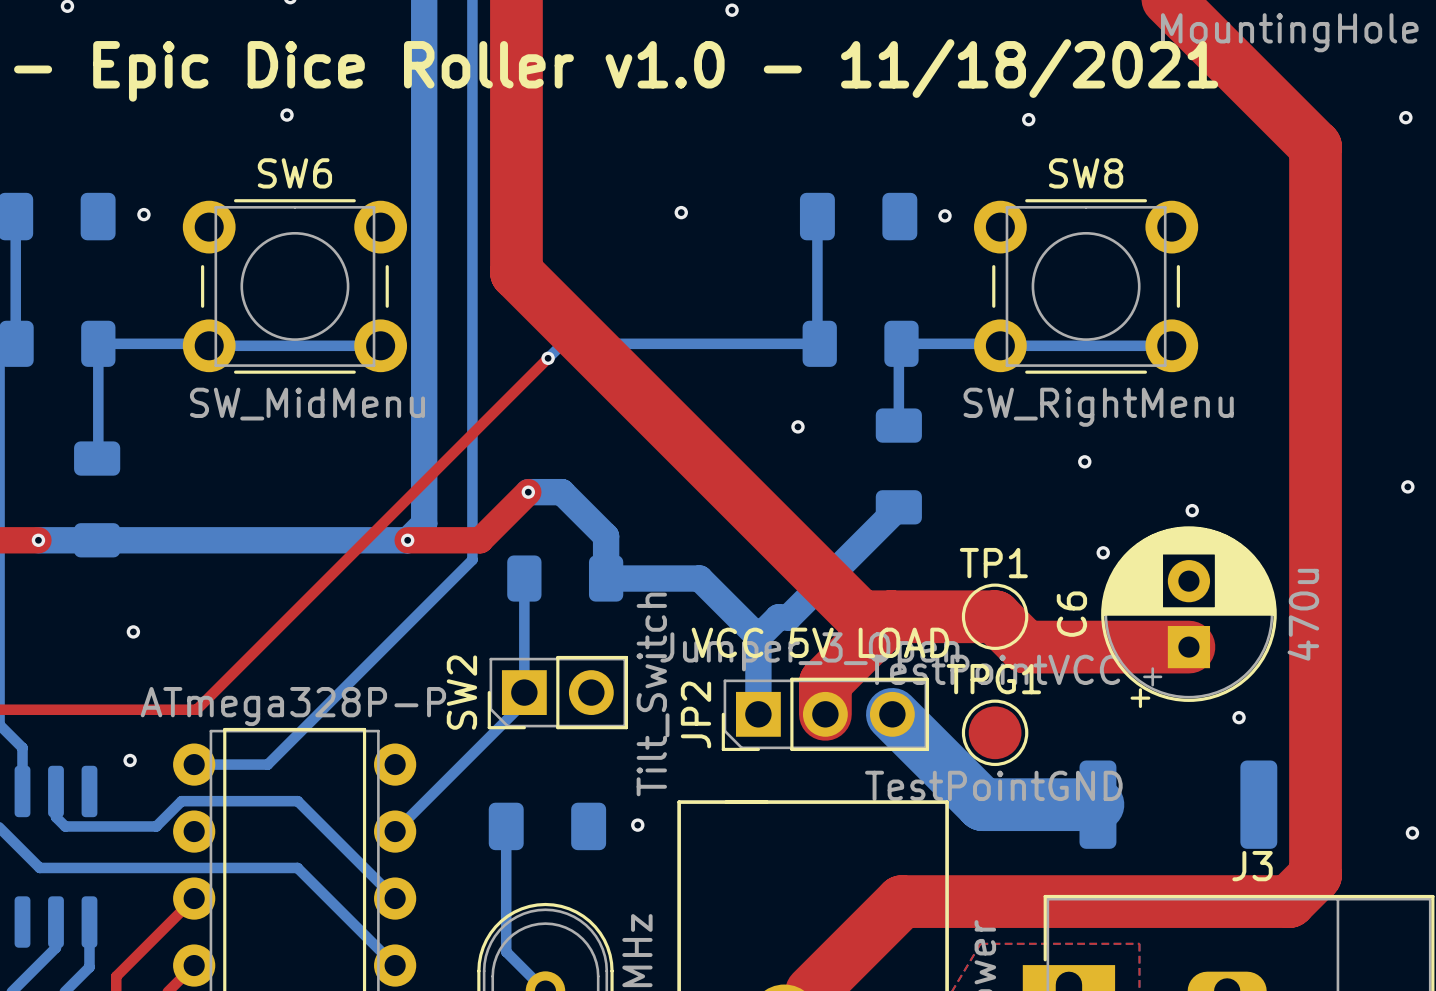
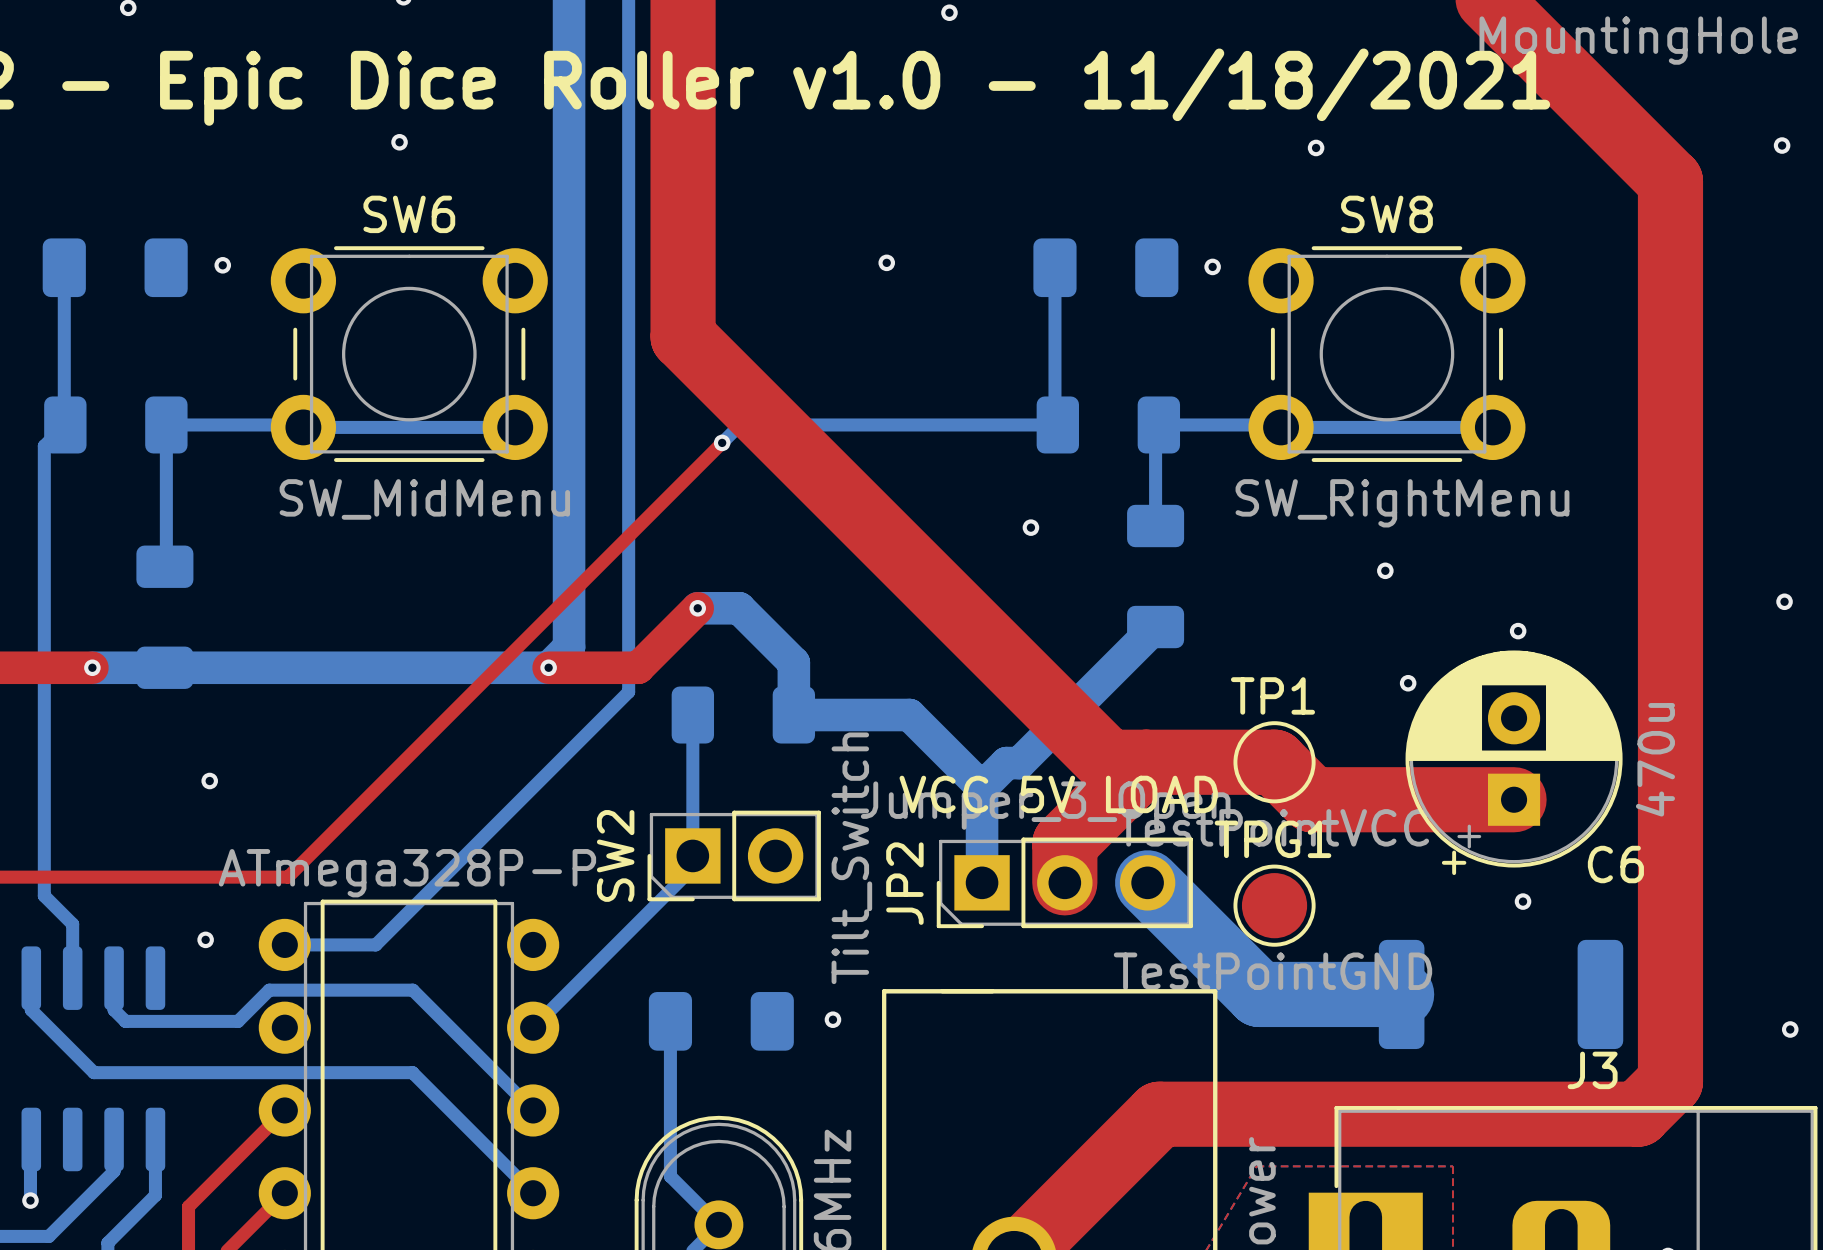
C6 name rotation: 0° (1071, 614) -> 90° clockwise (1615, 864)
C6 name position: C6 (1071, 614) -> C6 (1615, 864)
via position: (1239, 717) -> (1523, 901)

